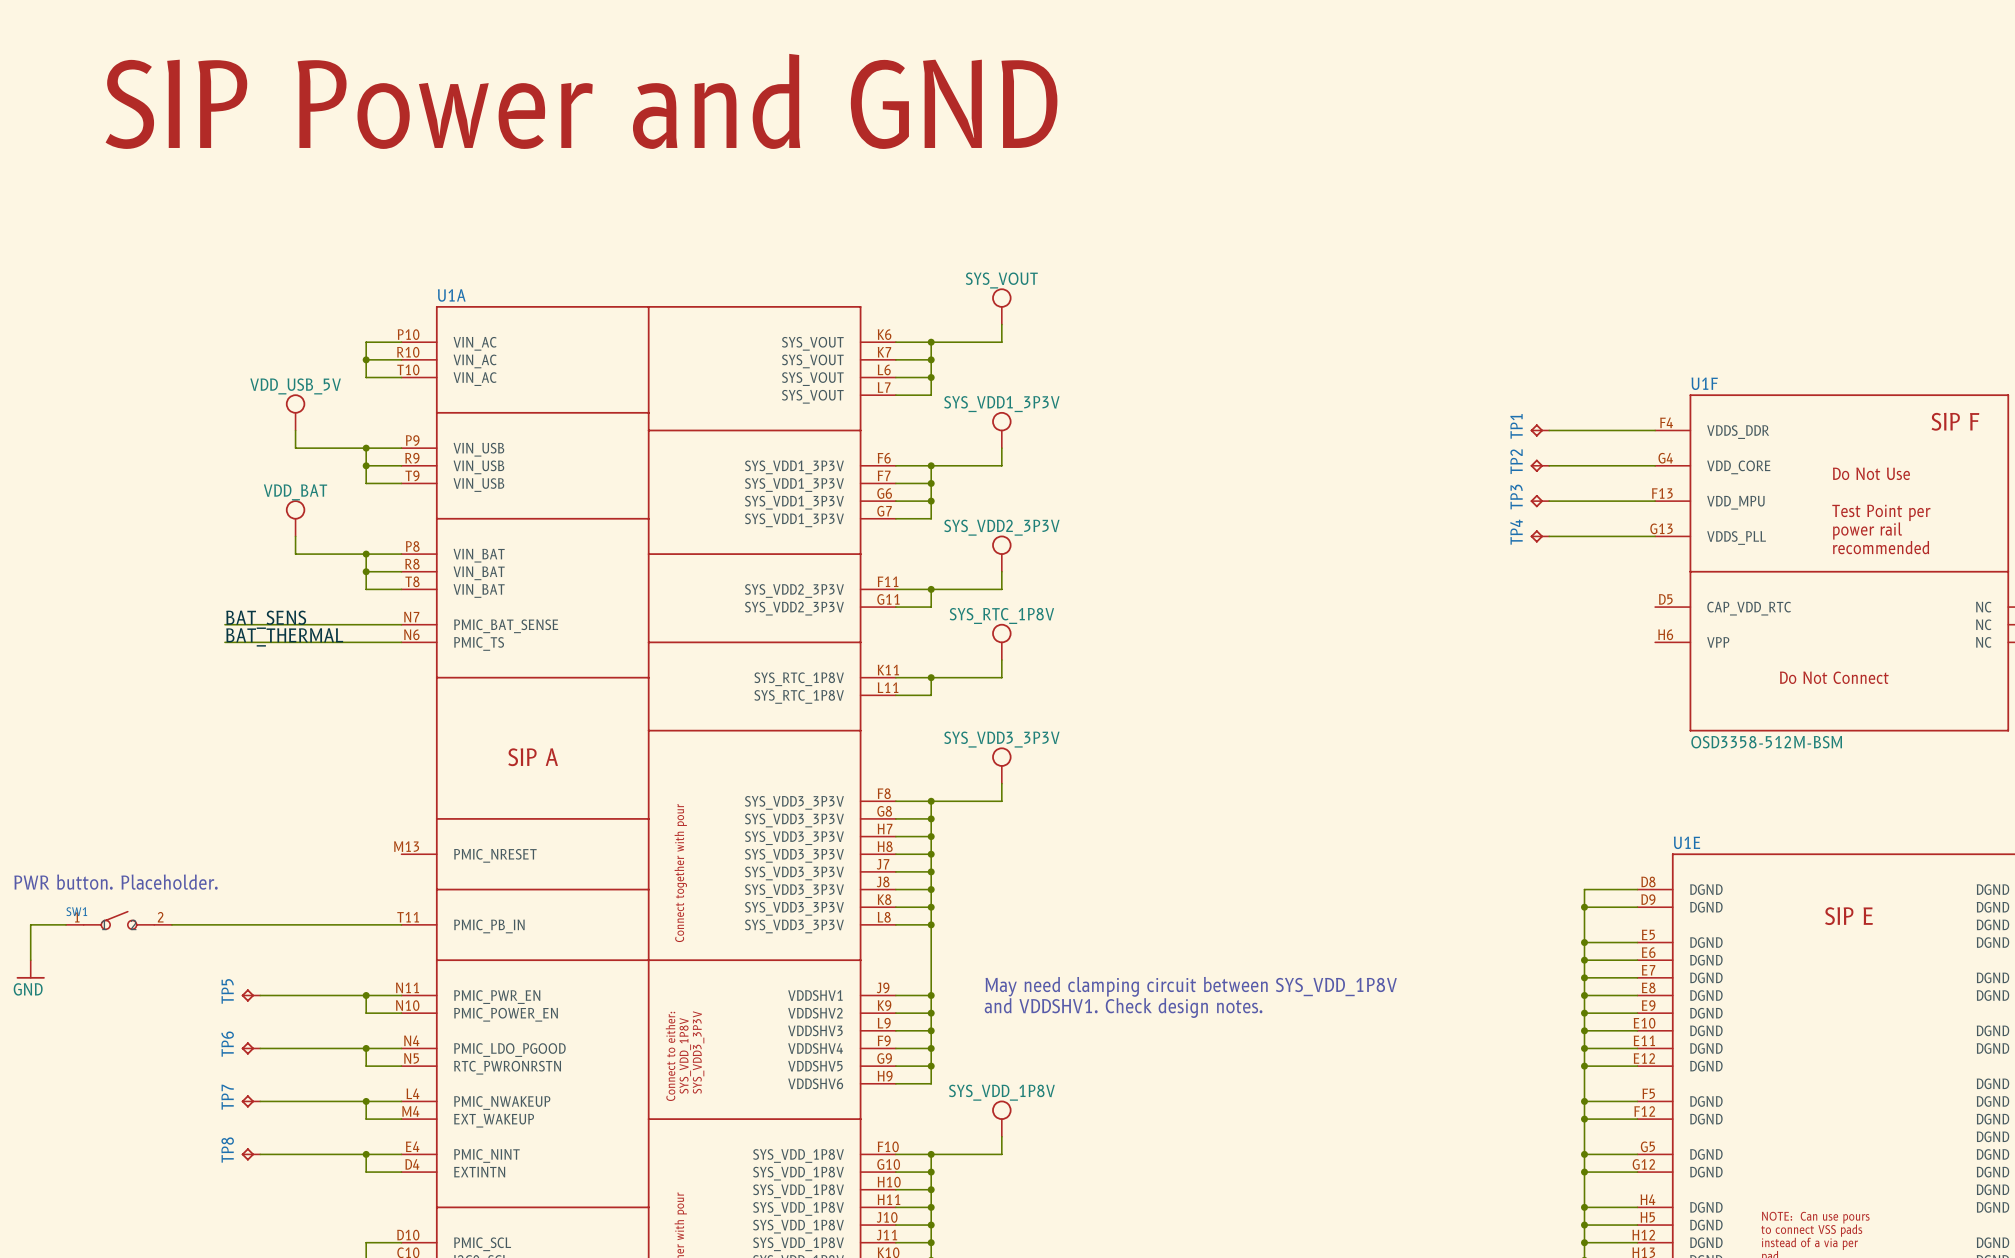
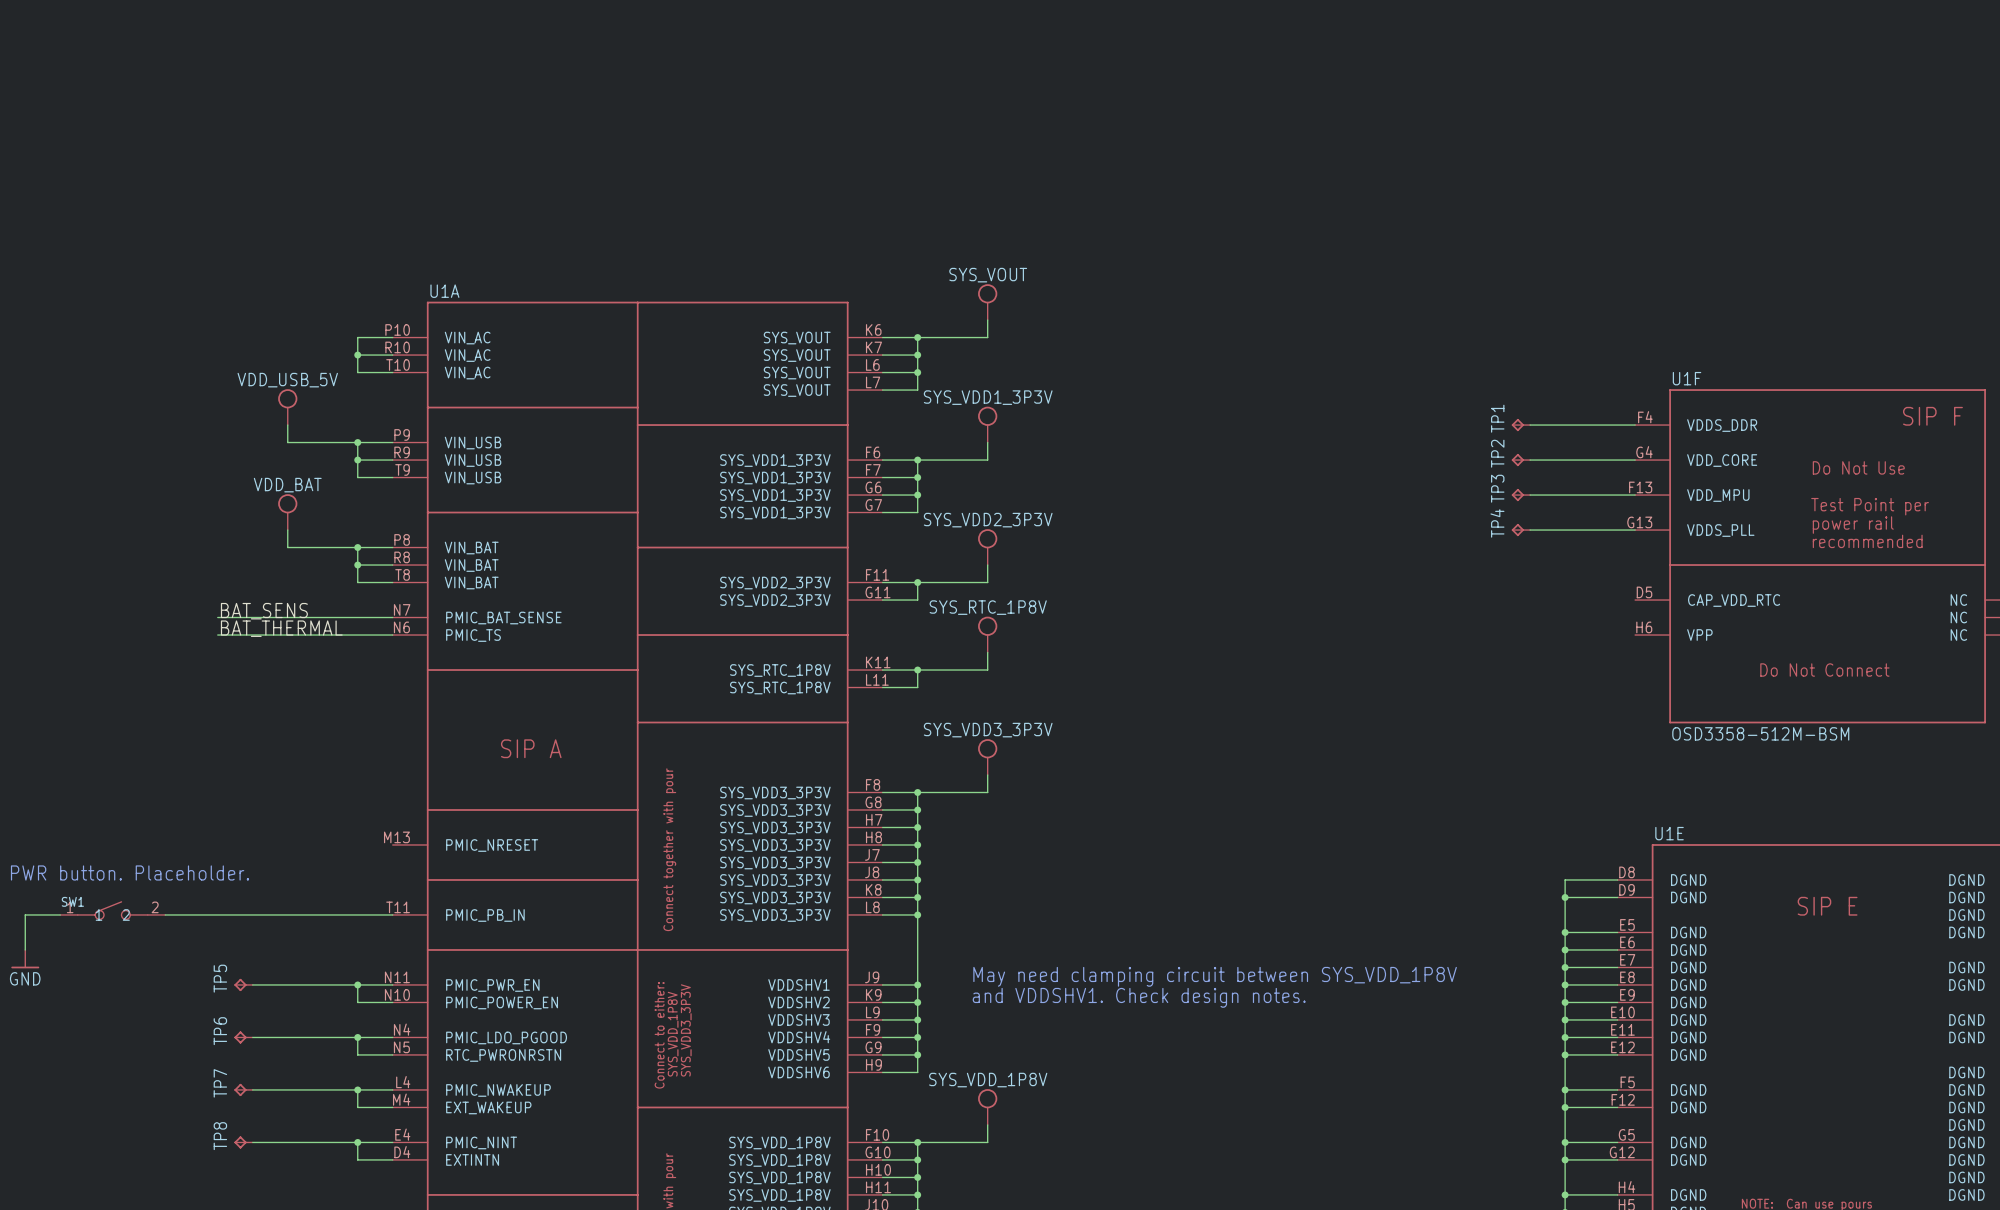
text: SIP Power and GND (581, 101) -> none

